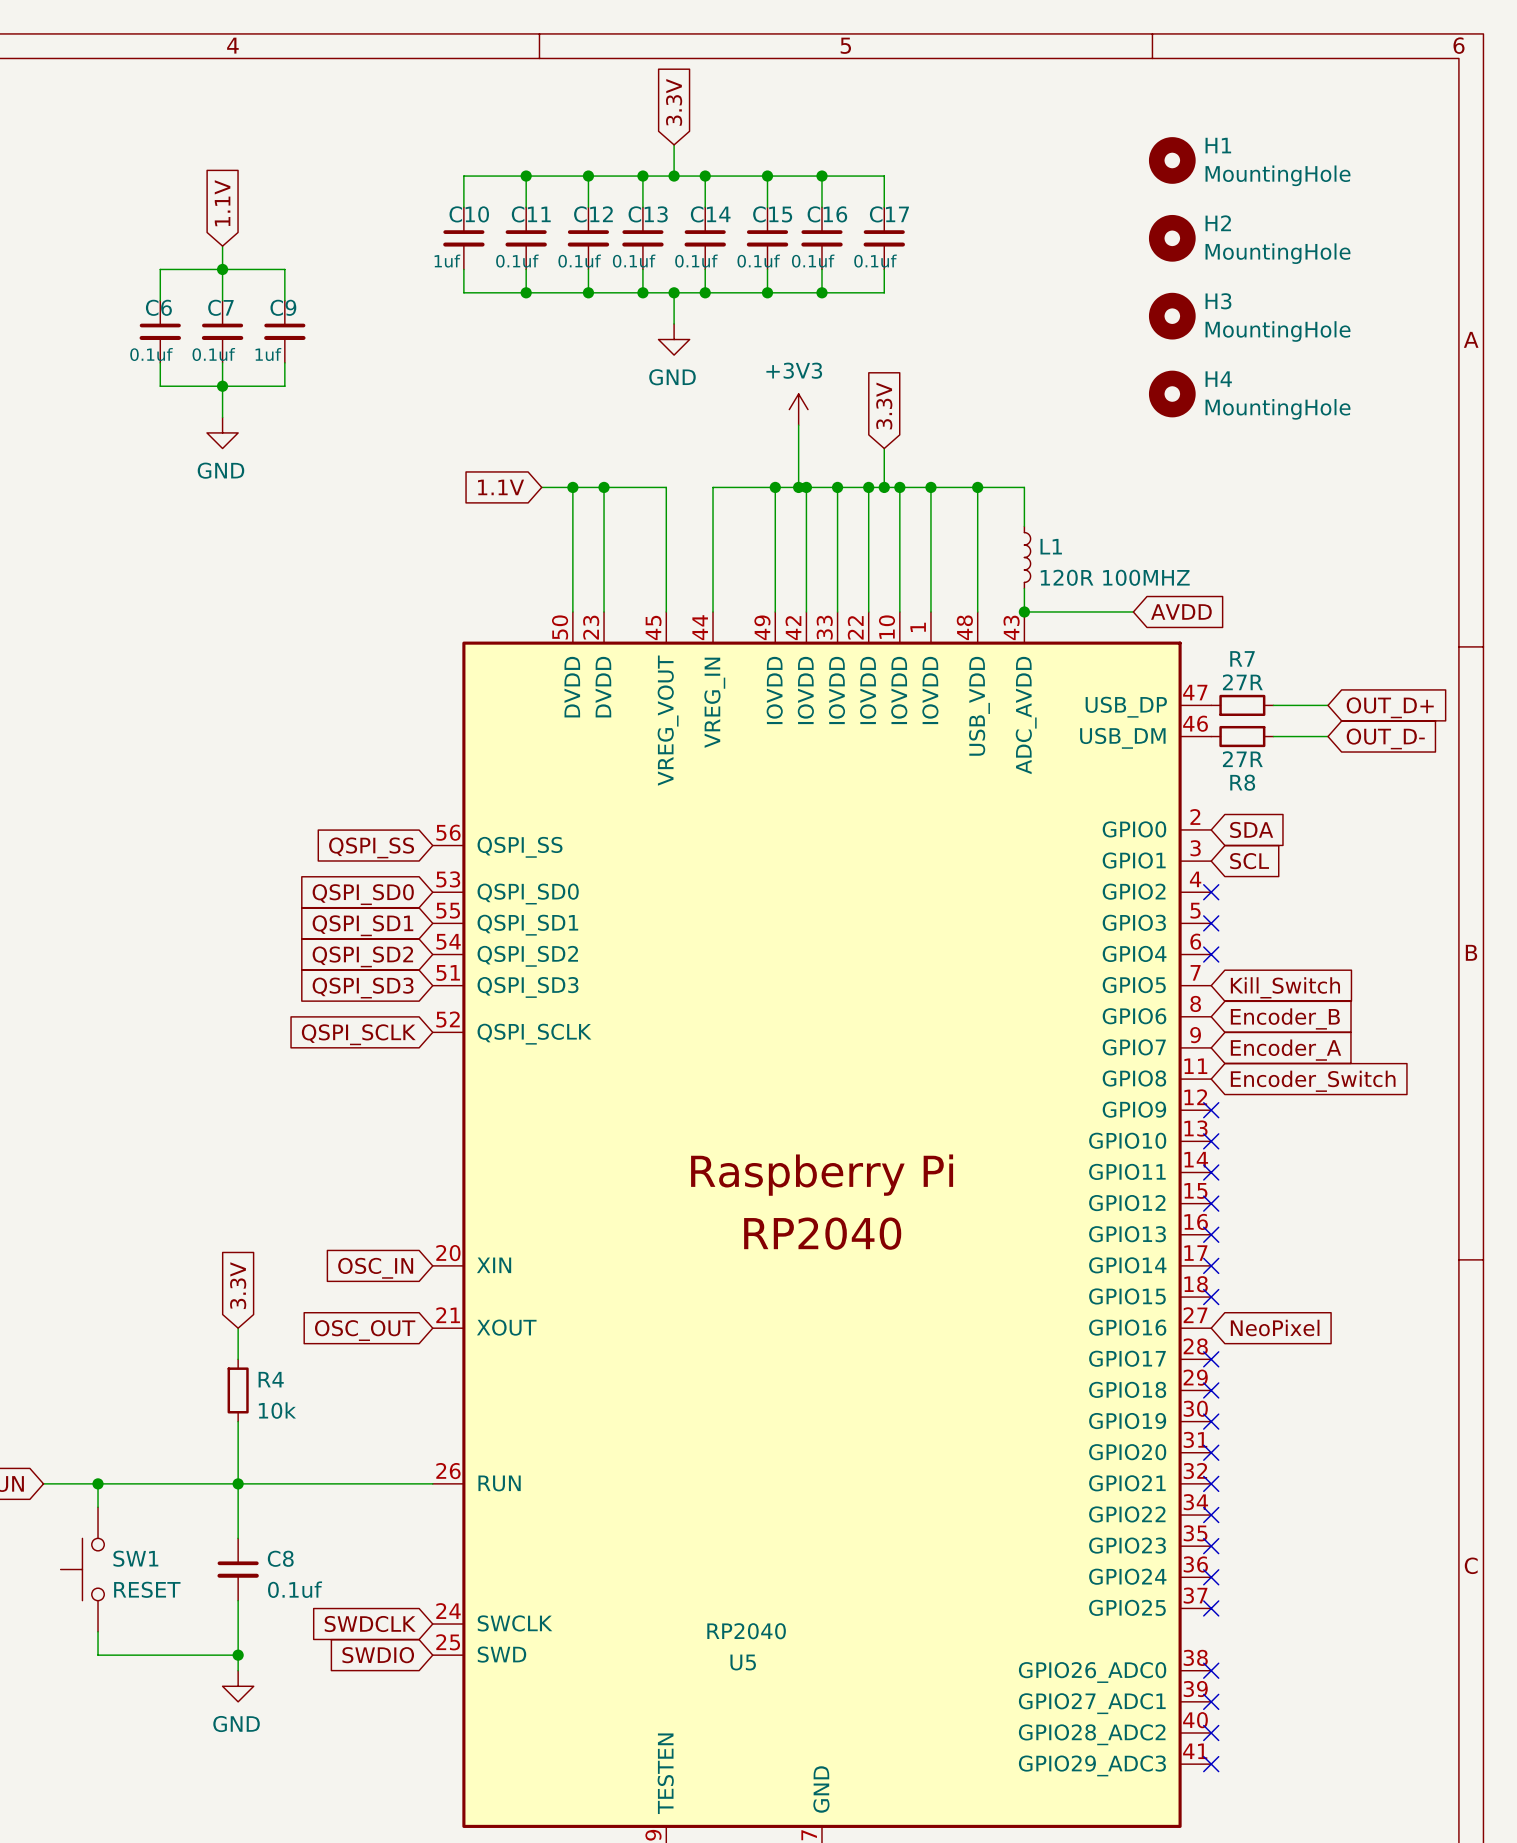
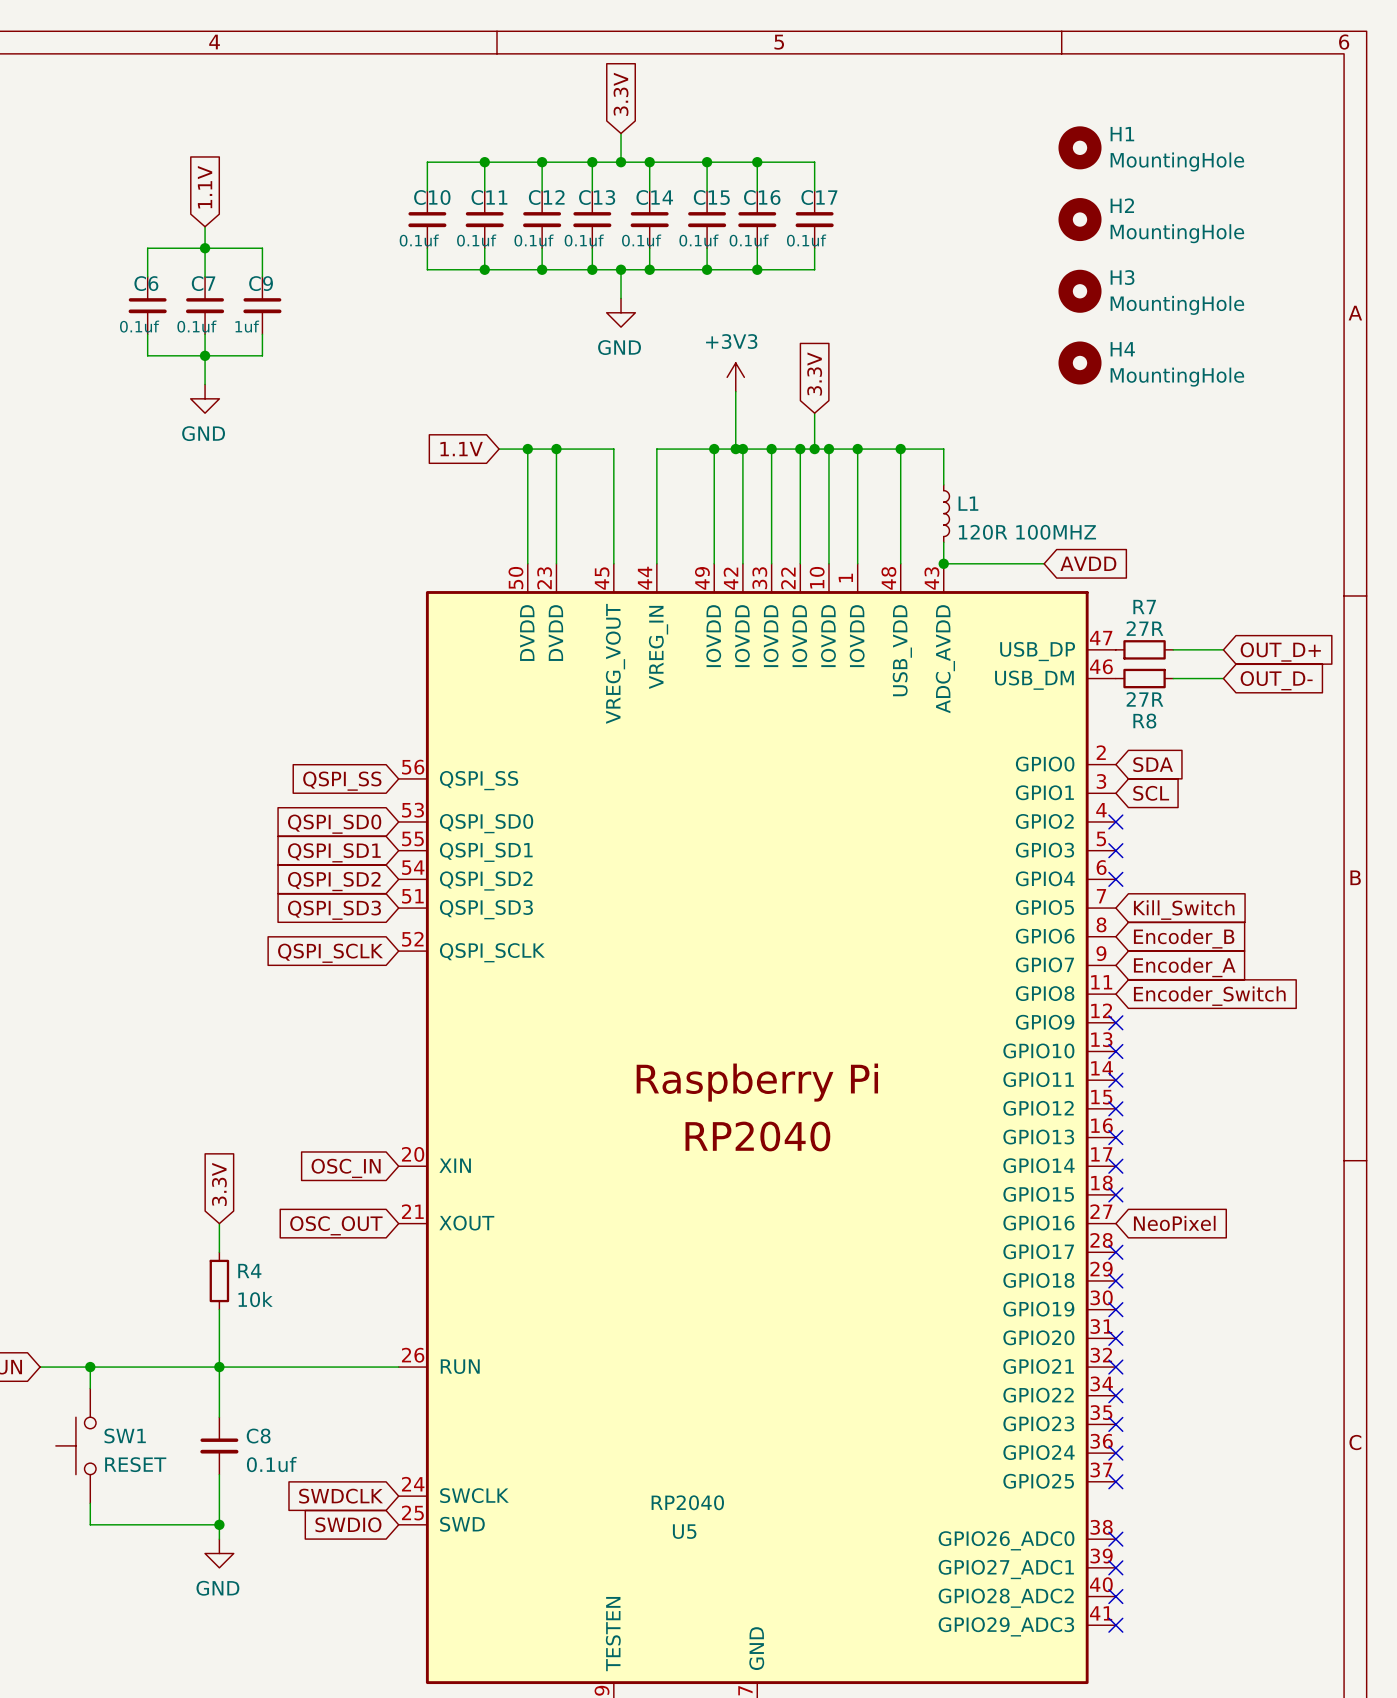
C10 value: 1uf (447, 261) -> 0.1uf (419, 240)

